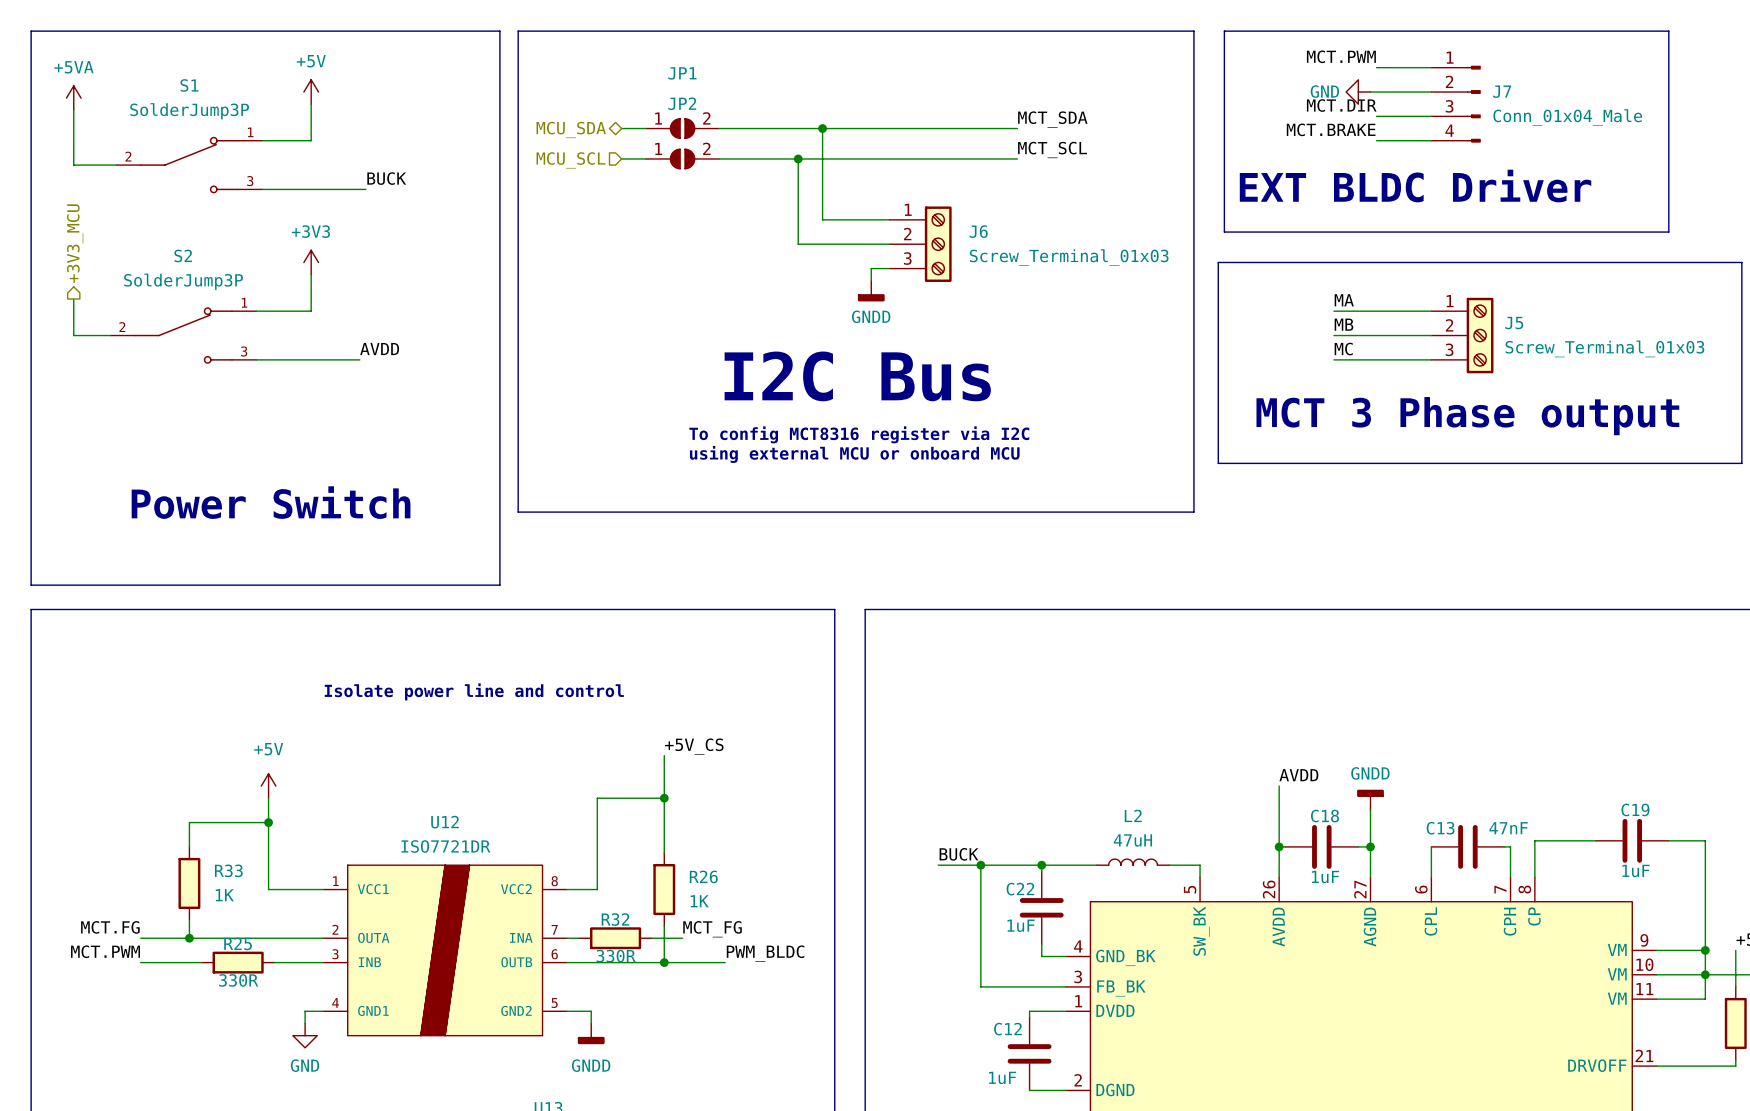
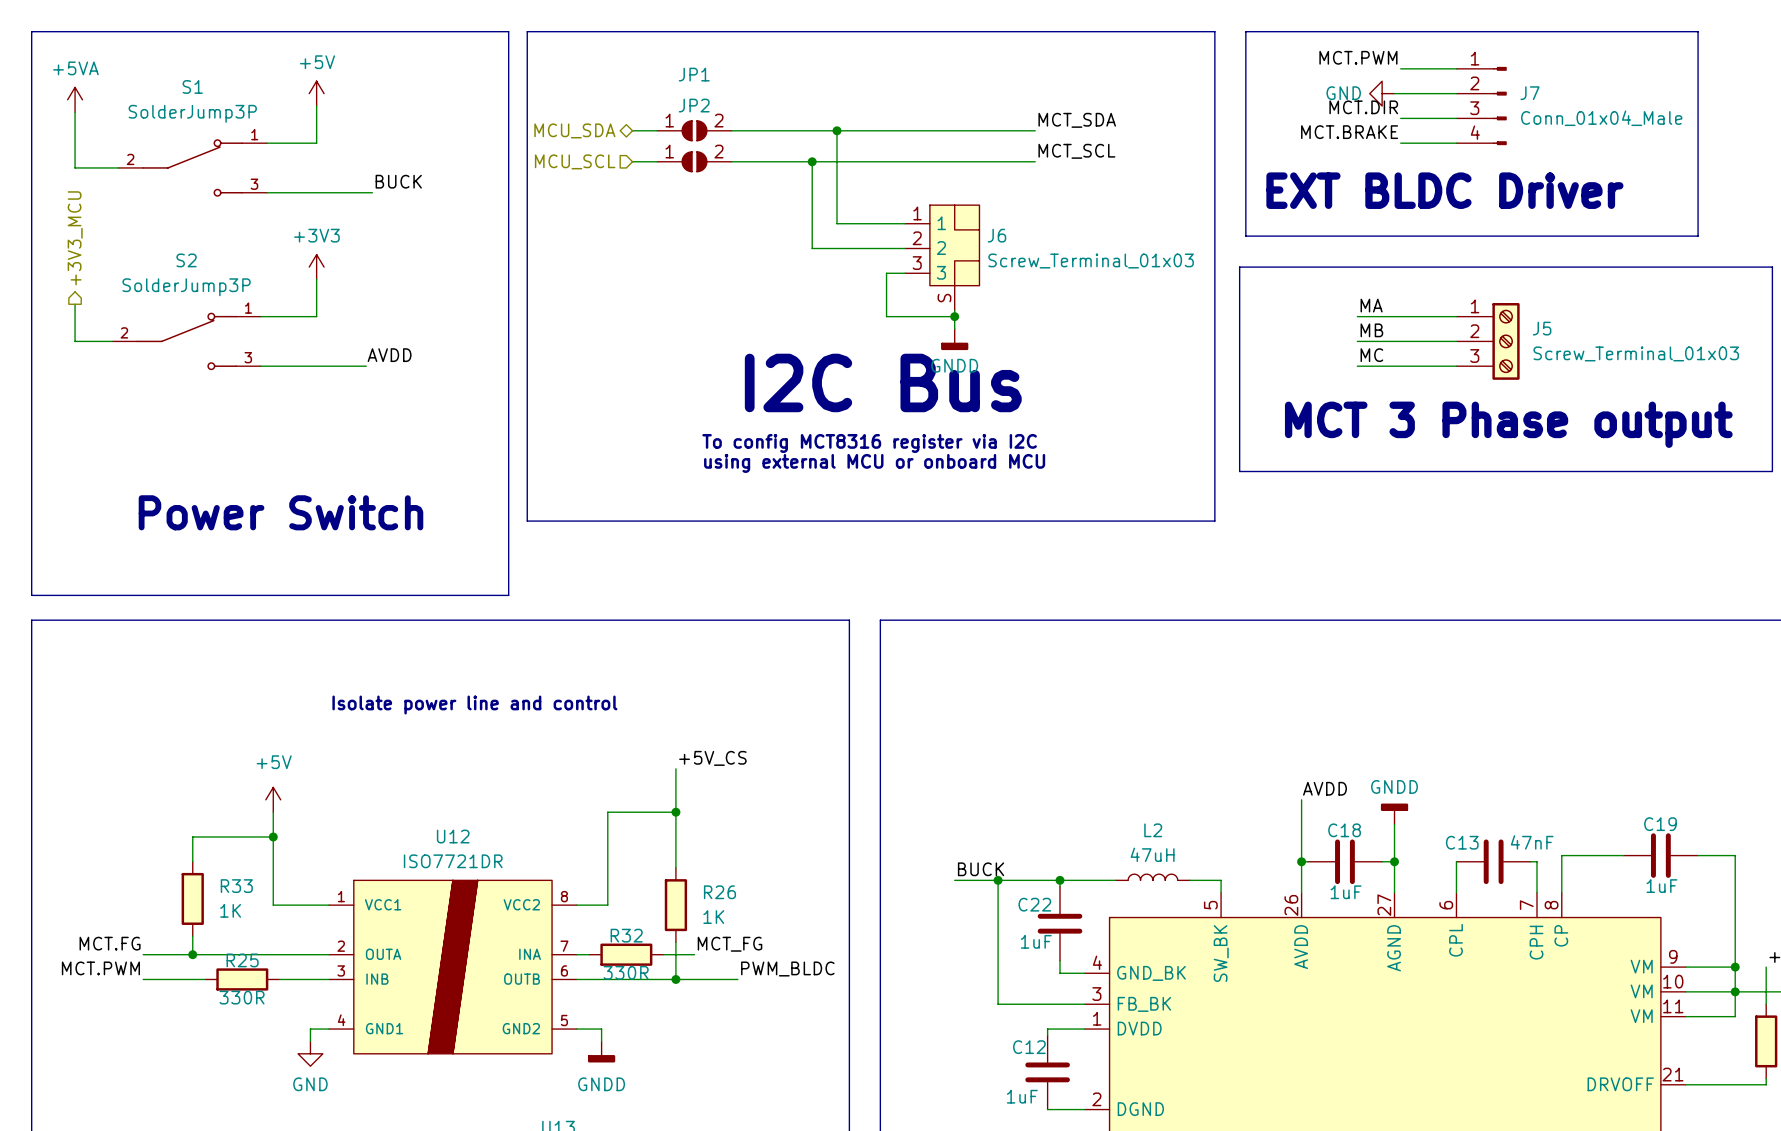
J6 symbol: [889, 206, 952, 282] -> [905, 205, 980, 311]
wire: none -> (886, 285) (886, 316) (954, 316)
power symbol position: GNDD (871, 291) -> GNDD (954, 339)
wire: none -> (954, 310) (954, 329)
junction: none -> (954, 316)

